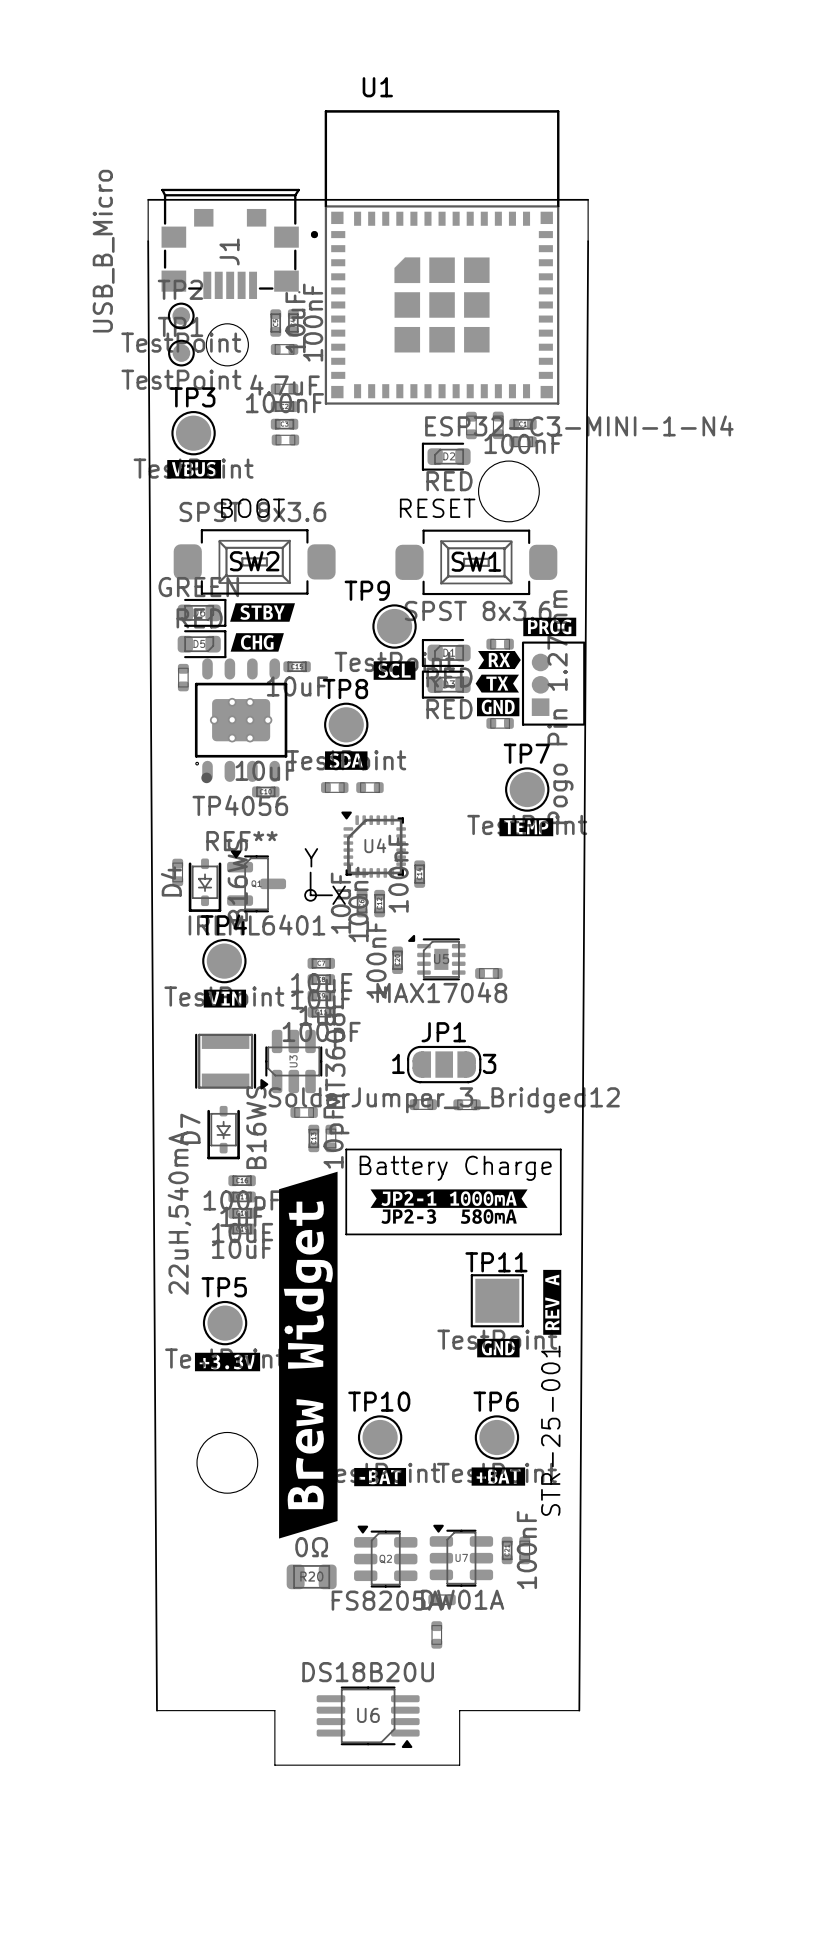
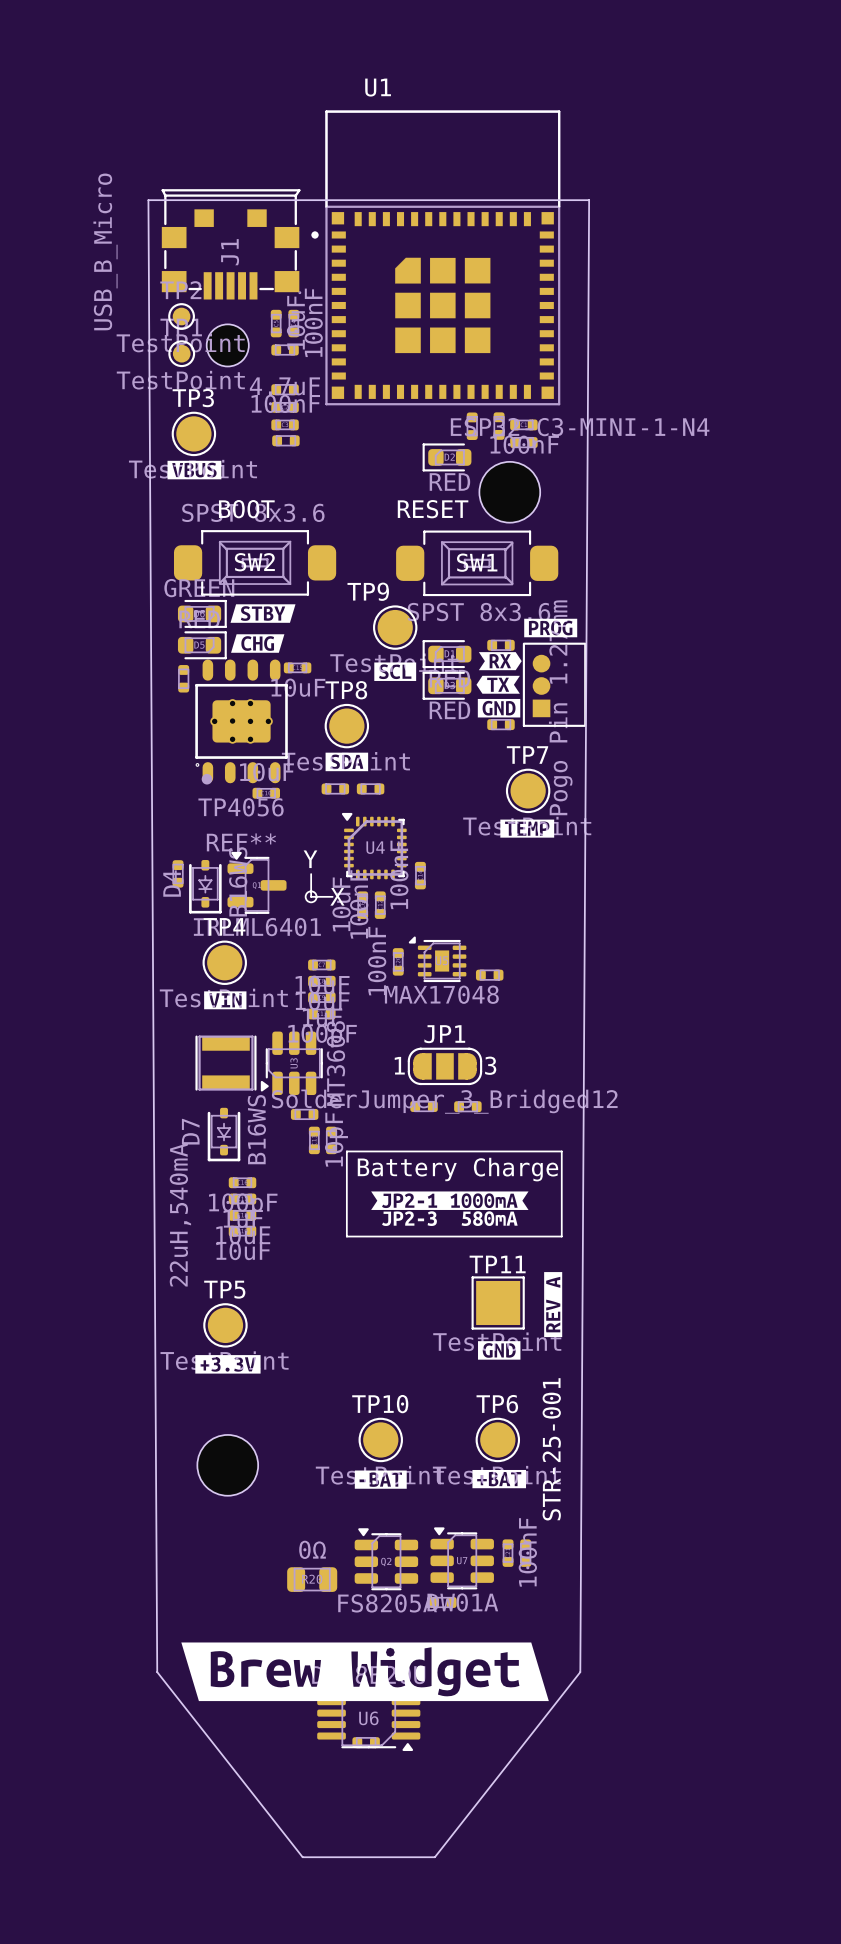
board edge: (148, 199) (156, 1710) (274, 1710) (274, 1765) (459, 1765) (459, 1710) (579, 1710) (588, 199) -> (148, 200) (157, 1672) (302, 1857) (434, 1857) (580, 1672) (589, 200)
drawing: [279, 1171, 338, 1539] -> none
part rotation: 0° (436, 1634) -> 90° clockwise (366, 1742)
part position: (436, 1634) -> (366, 1742)
drawing: none -> [181, 1642, 549, 1702]

